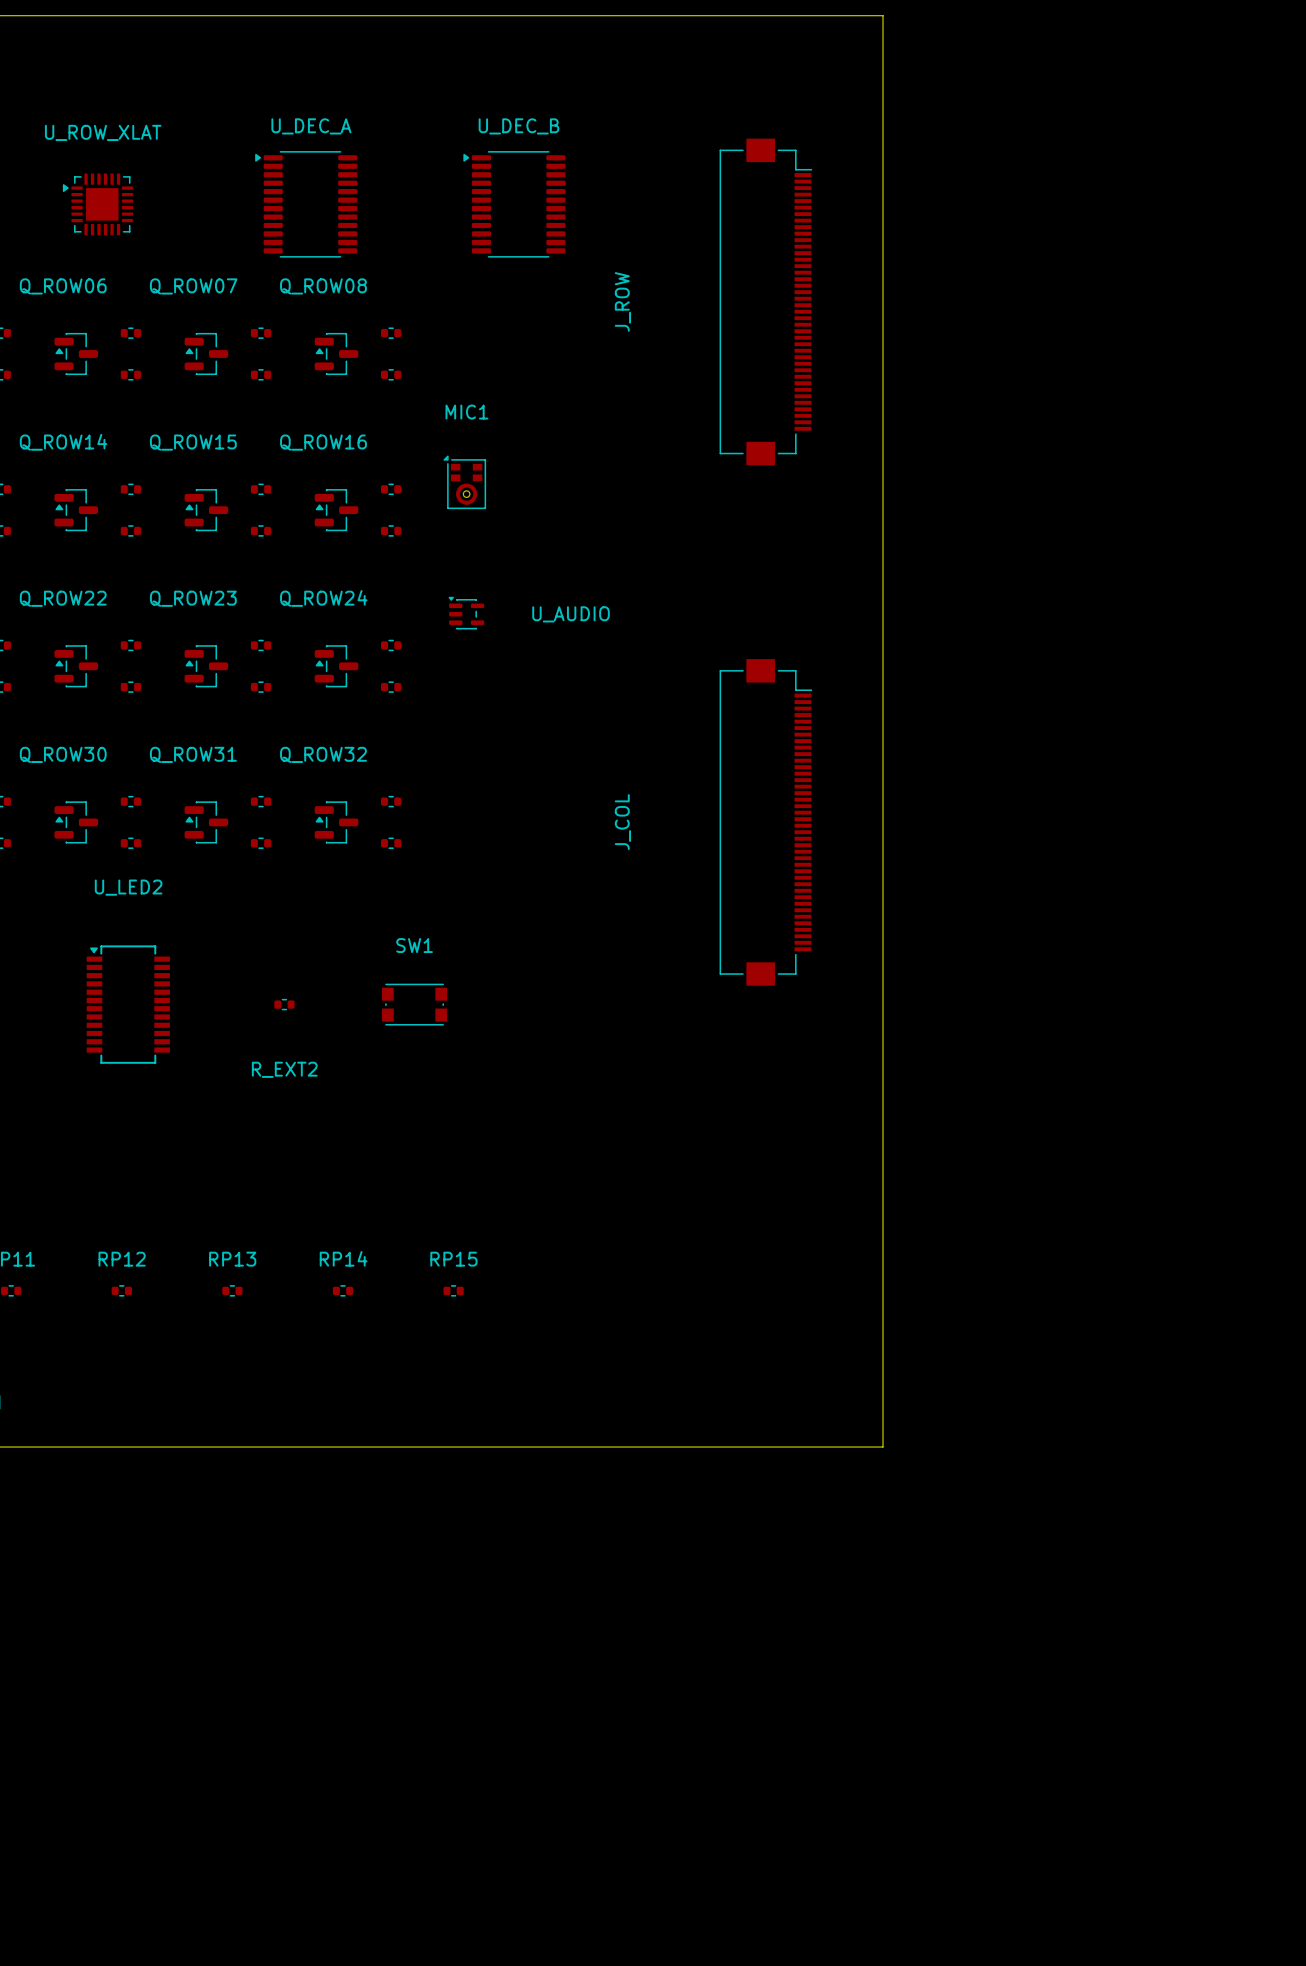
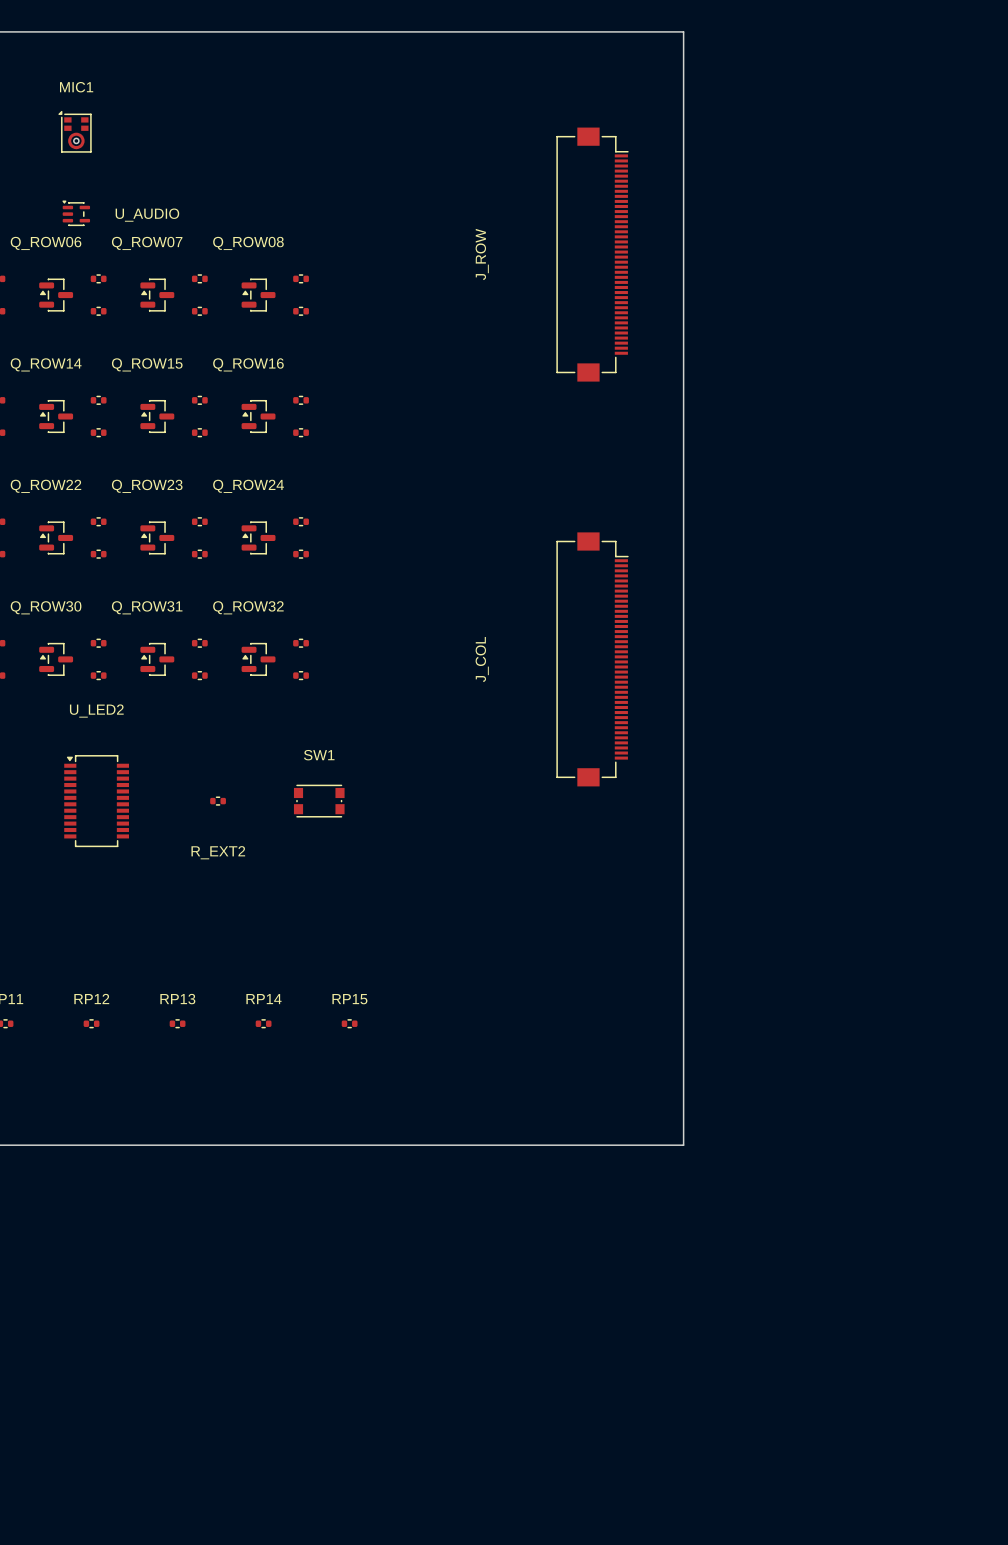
U_ROW_XLAT: (98, 204) -> none
U_DEC_A: (306, 204) -> none
U_DEC_B: (514, 204) -> none
U_AUDIO: none -> (76, 213)
MIC1 name position: MIC1 (466, 412) -> MIC1 (76, 87)
MIC1 position: (464, 482) -> (74, 131)
U_AUDIO: (466, 613) -> none

